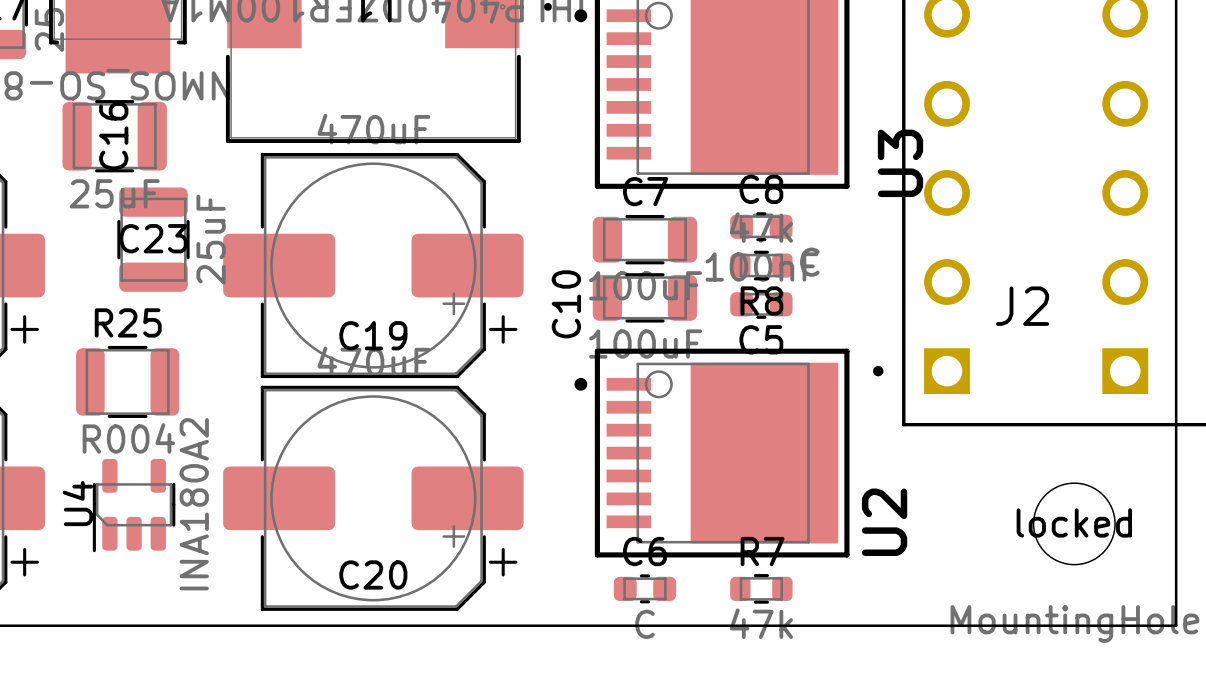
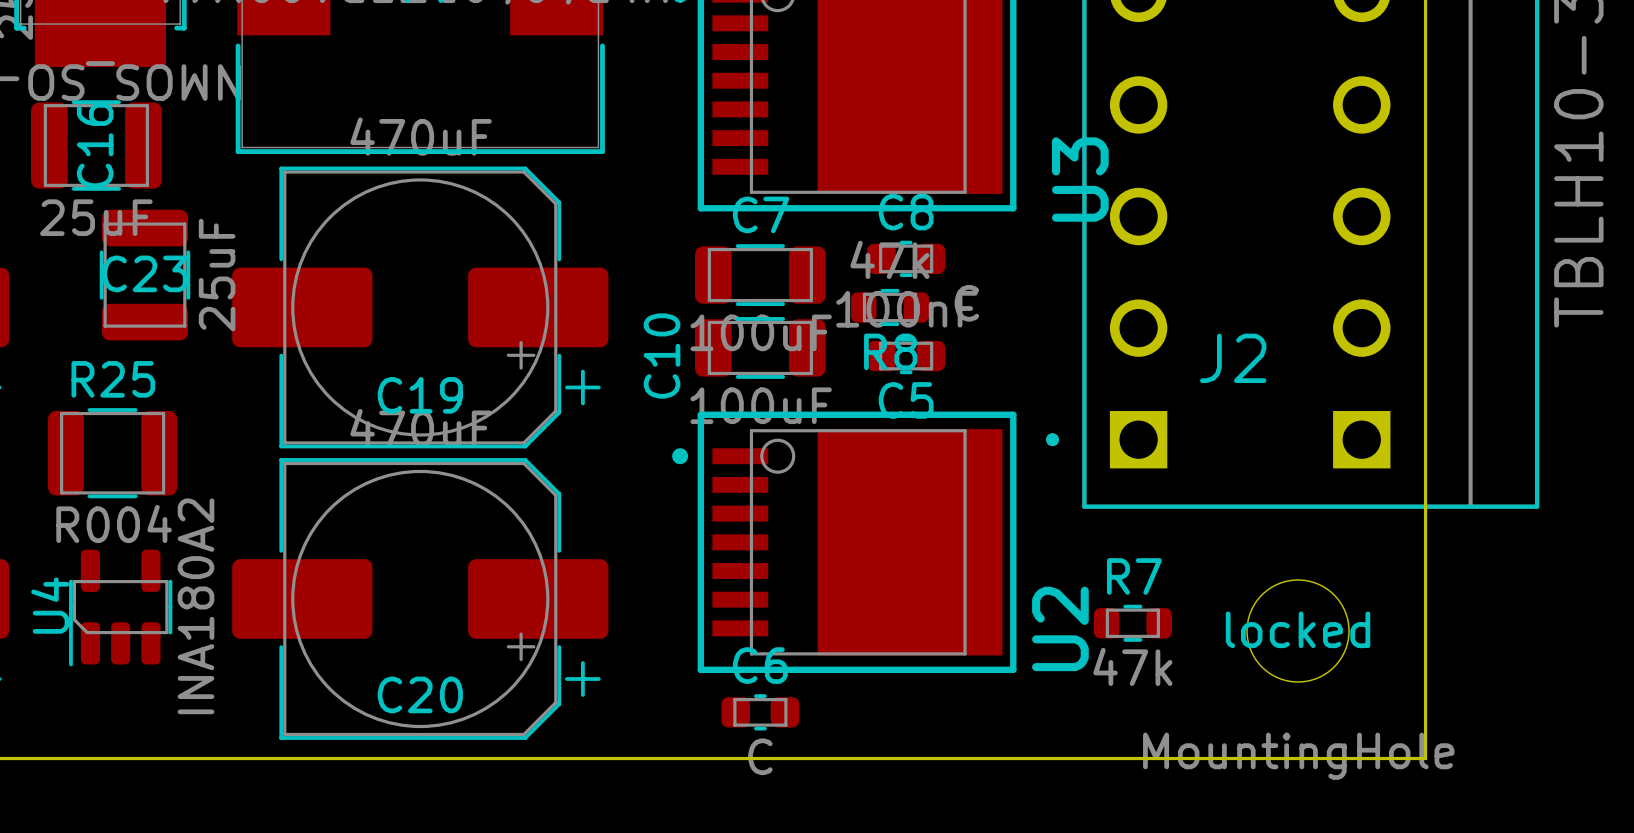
R8 position: (761, 265) -> (889, 307)
R7 position: (761, 588) -> (1132, 623)

